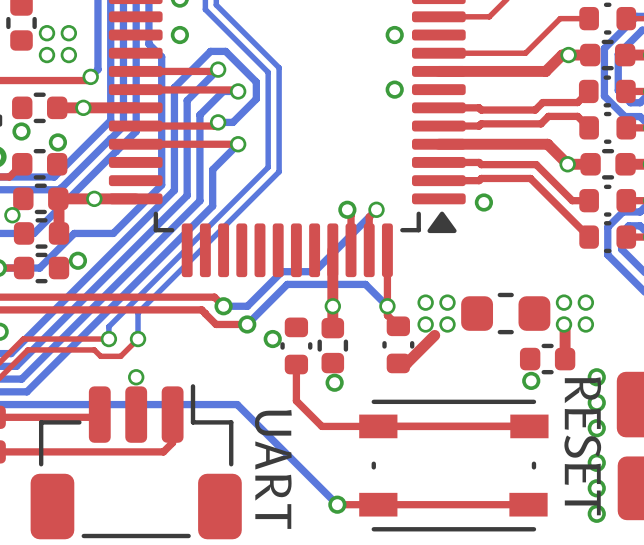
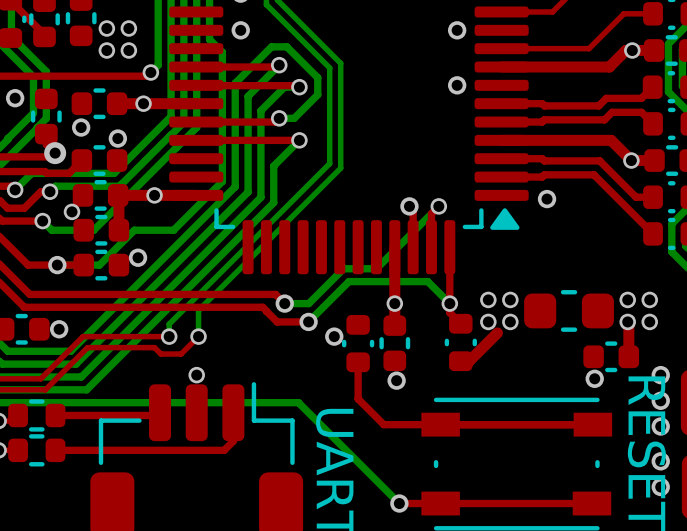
via: (596, 513) -> none

